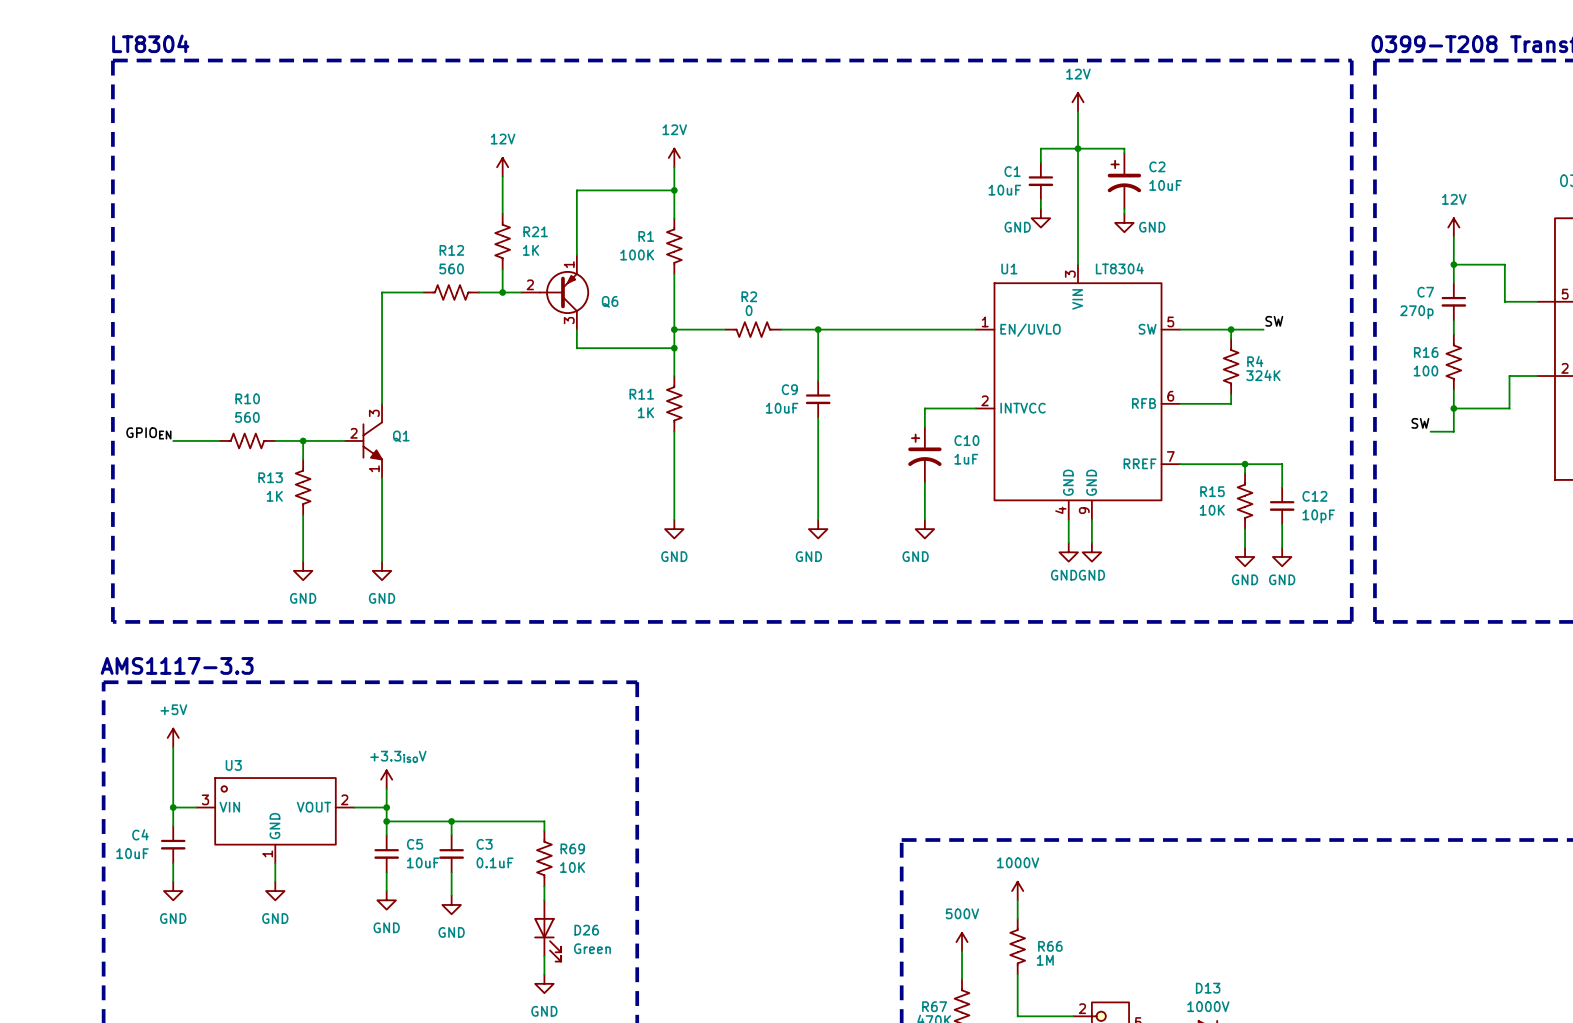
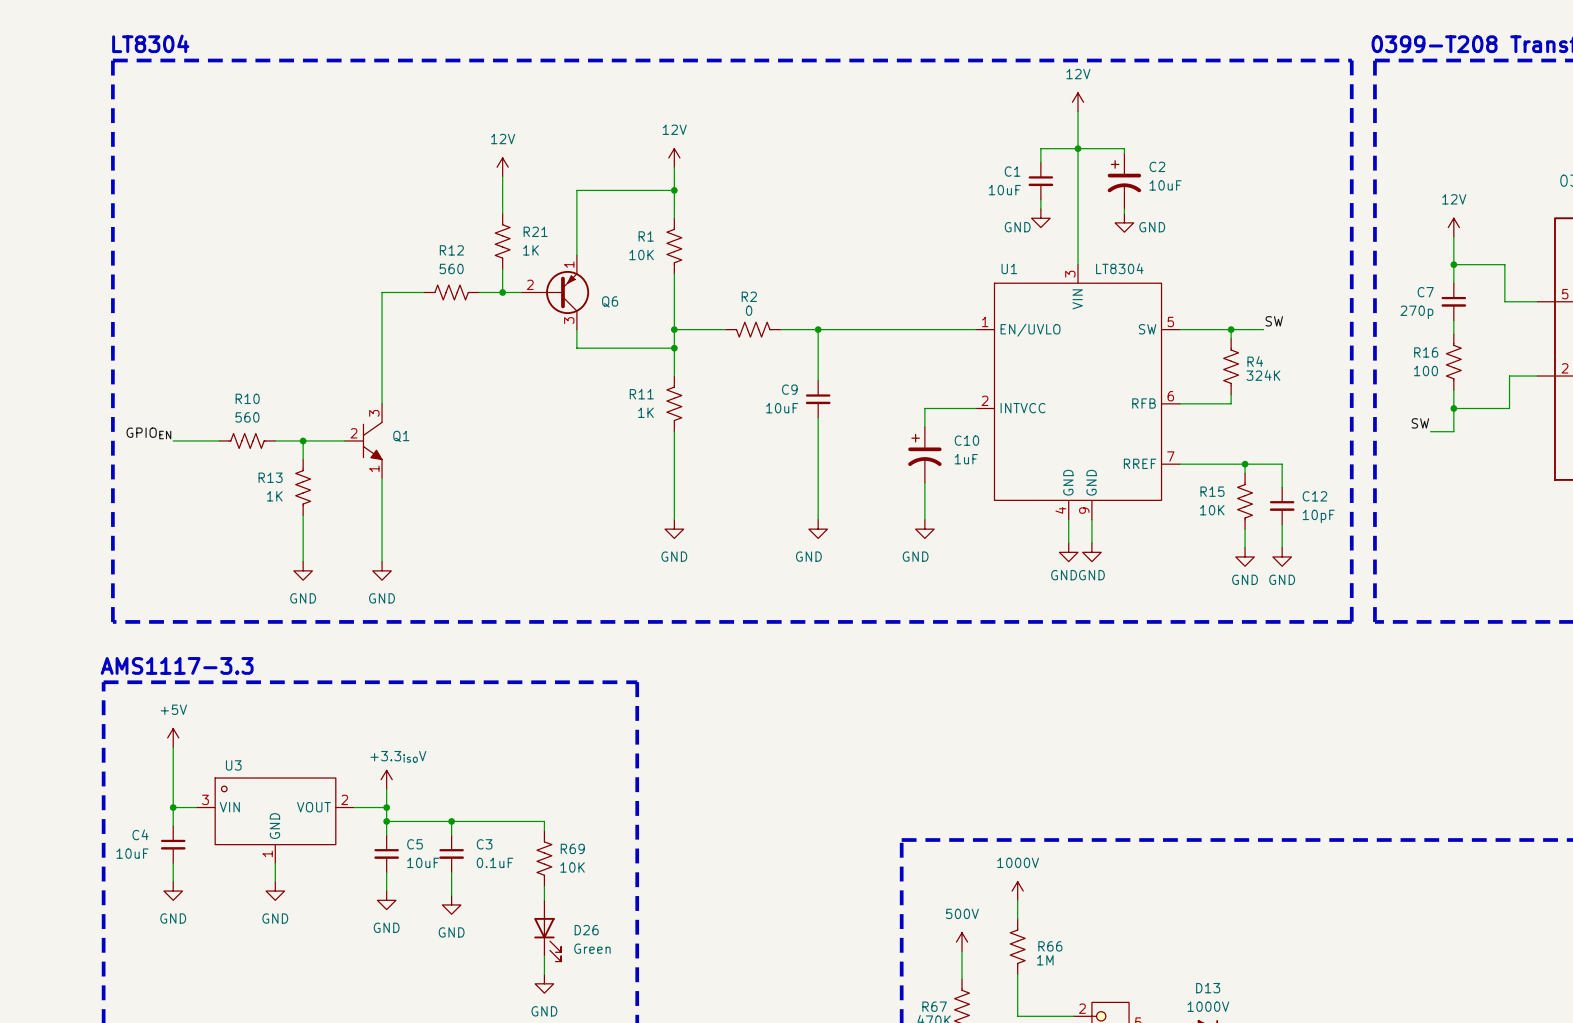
R1 value: 100K (637, 255) -> 10K (641, 255)

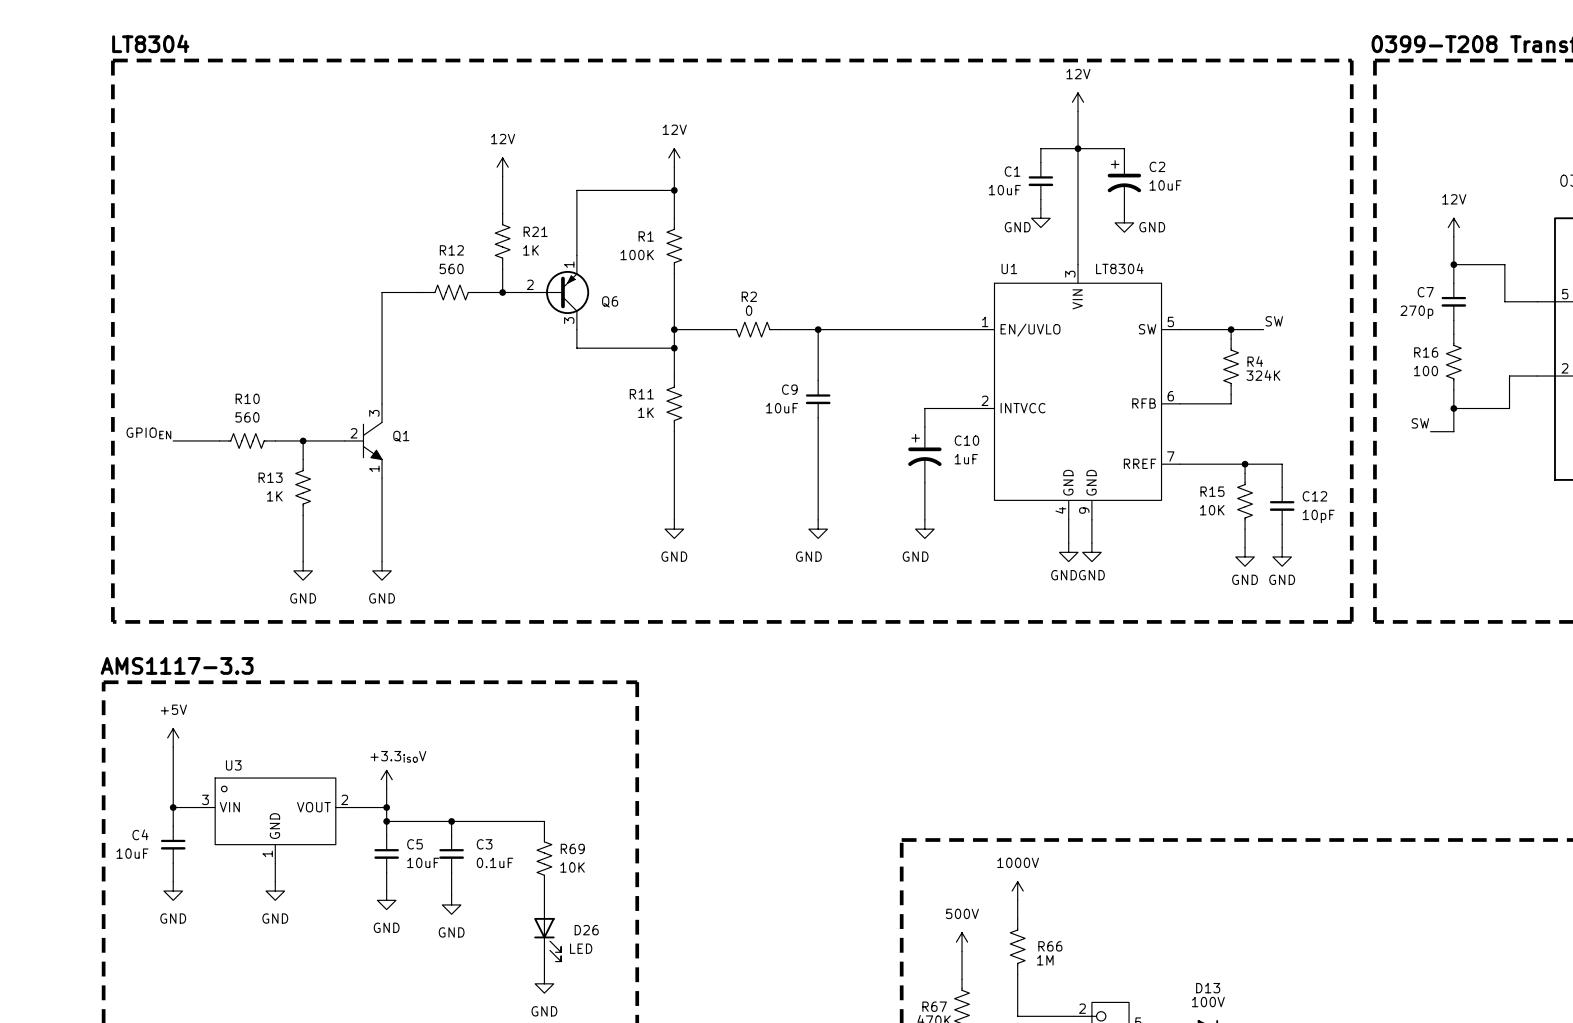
R1 value: 10K (641, 255) -> 100K (637, 255)
D26 value: Green (592, 948) -> LED (581, 948)
D13 value: 1000V (1208, 1006) -> 100V (1208, 1002)

